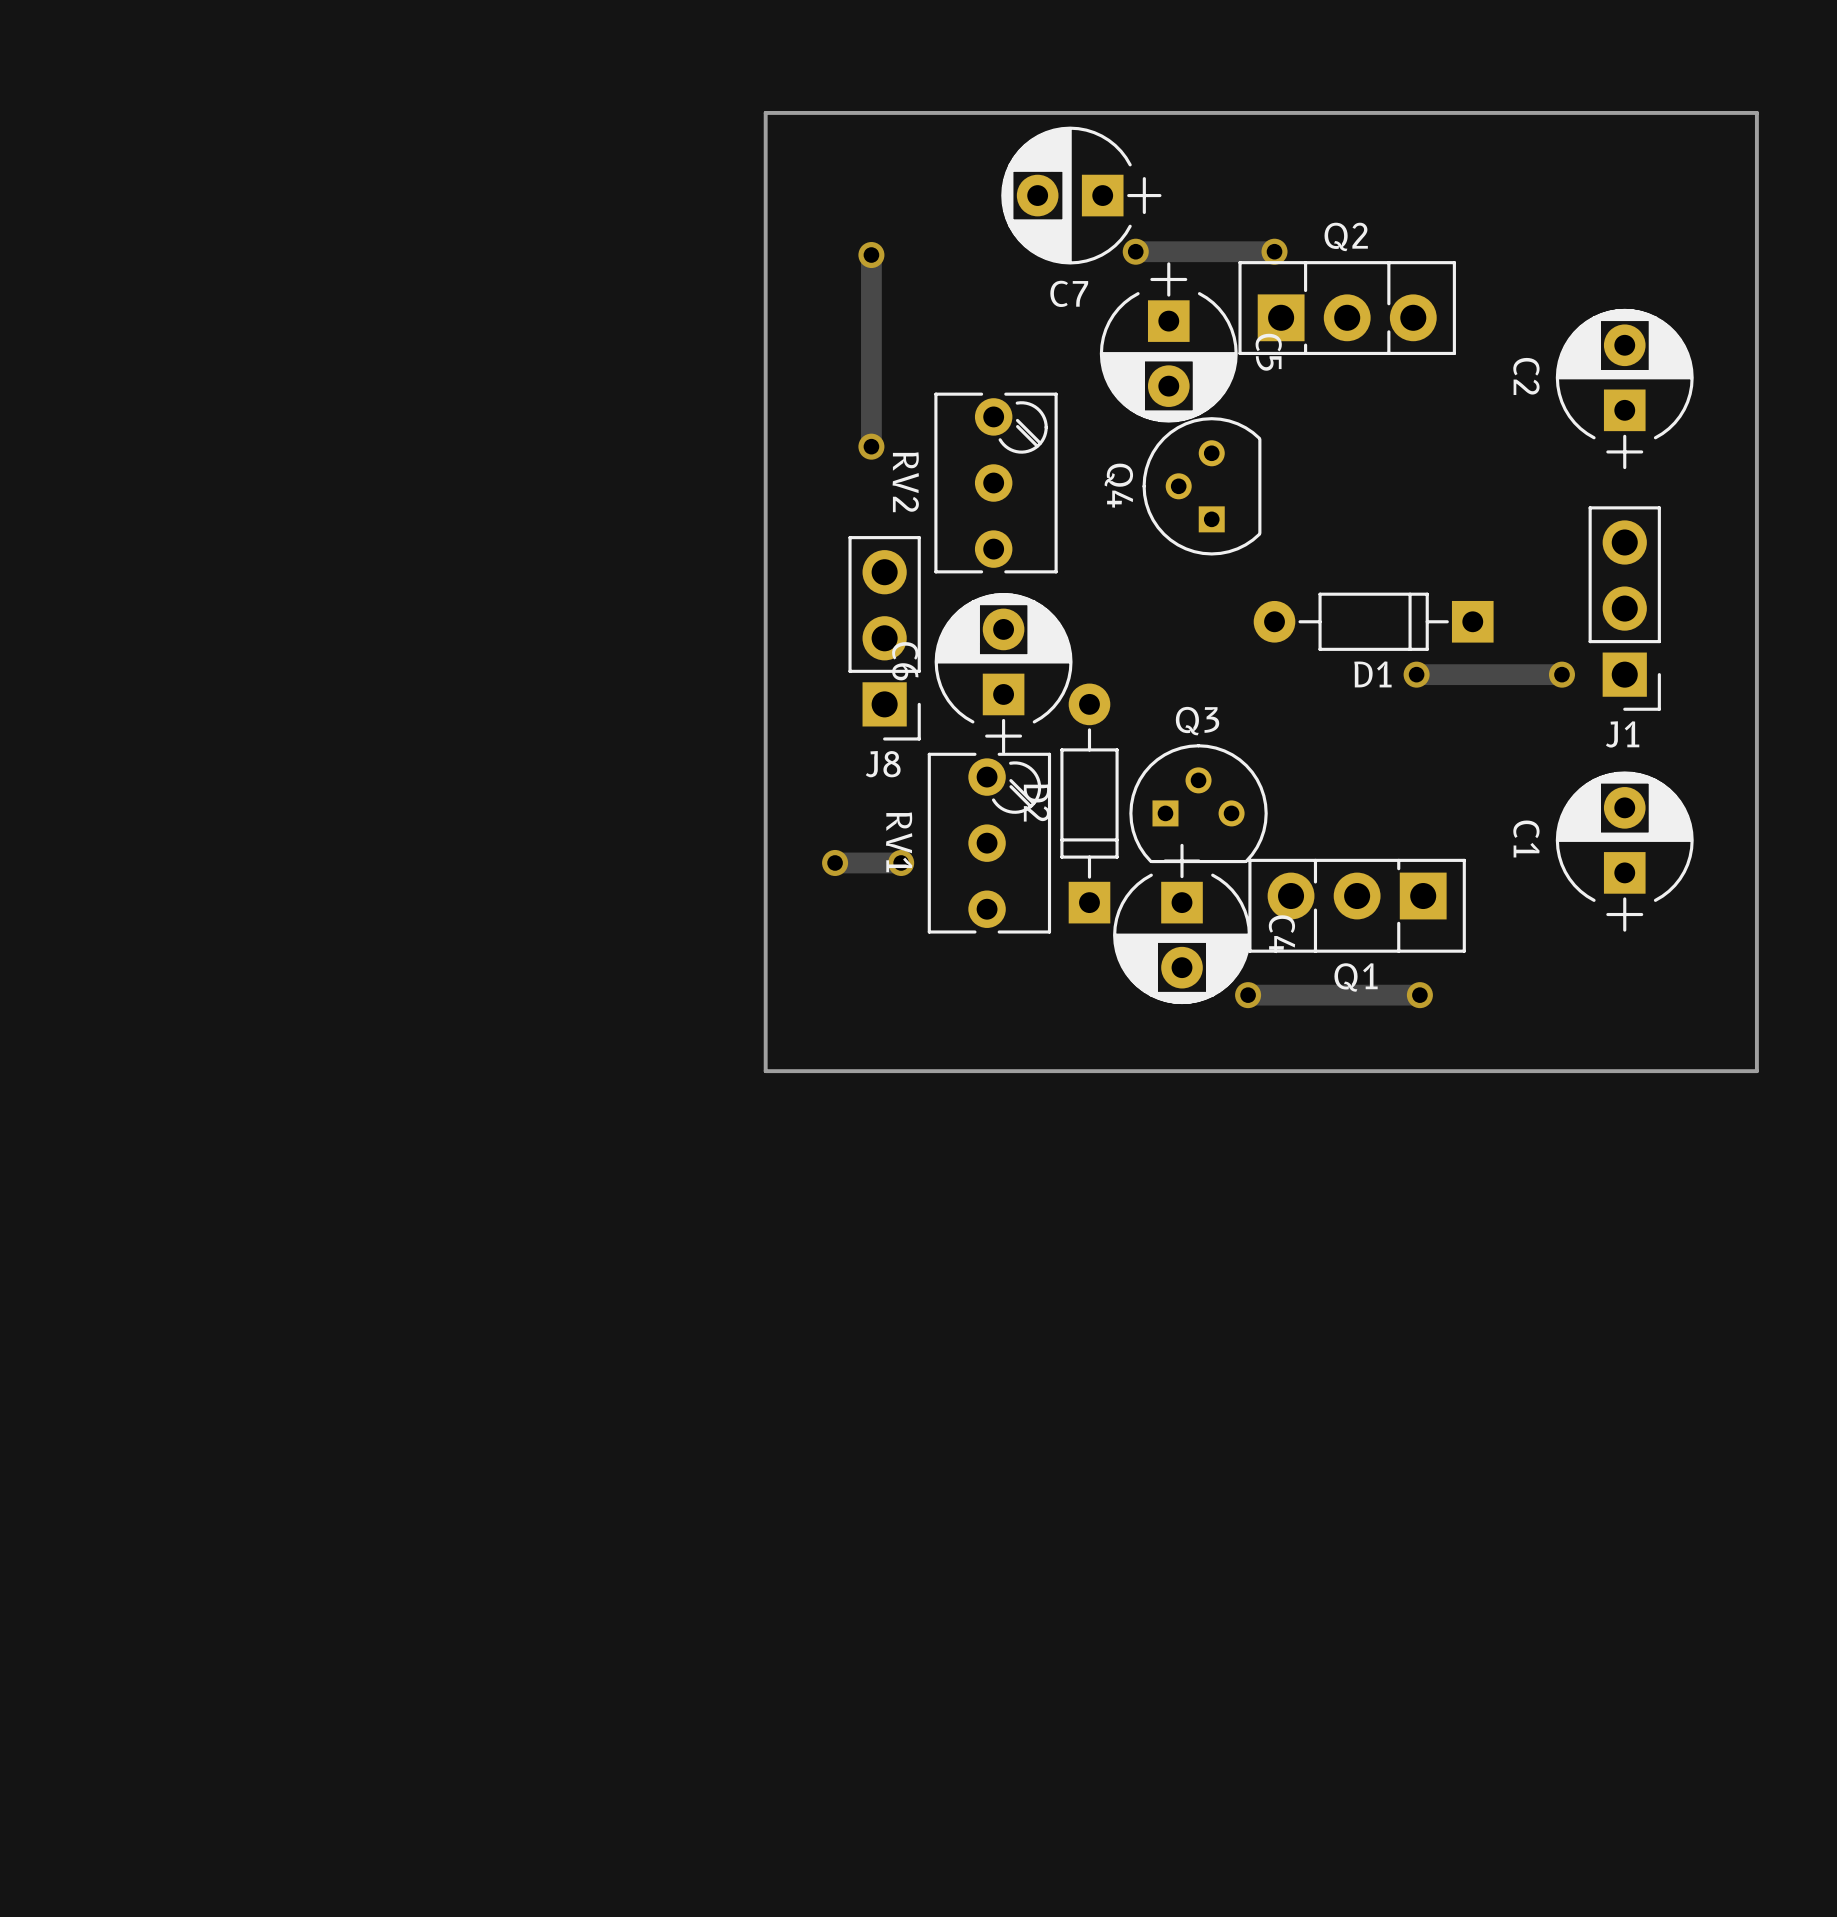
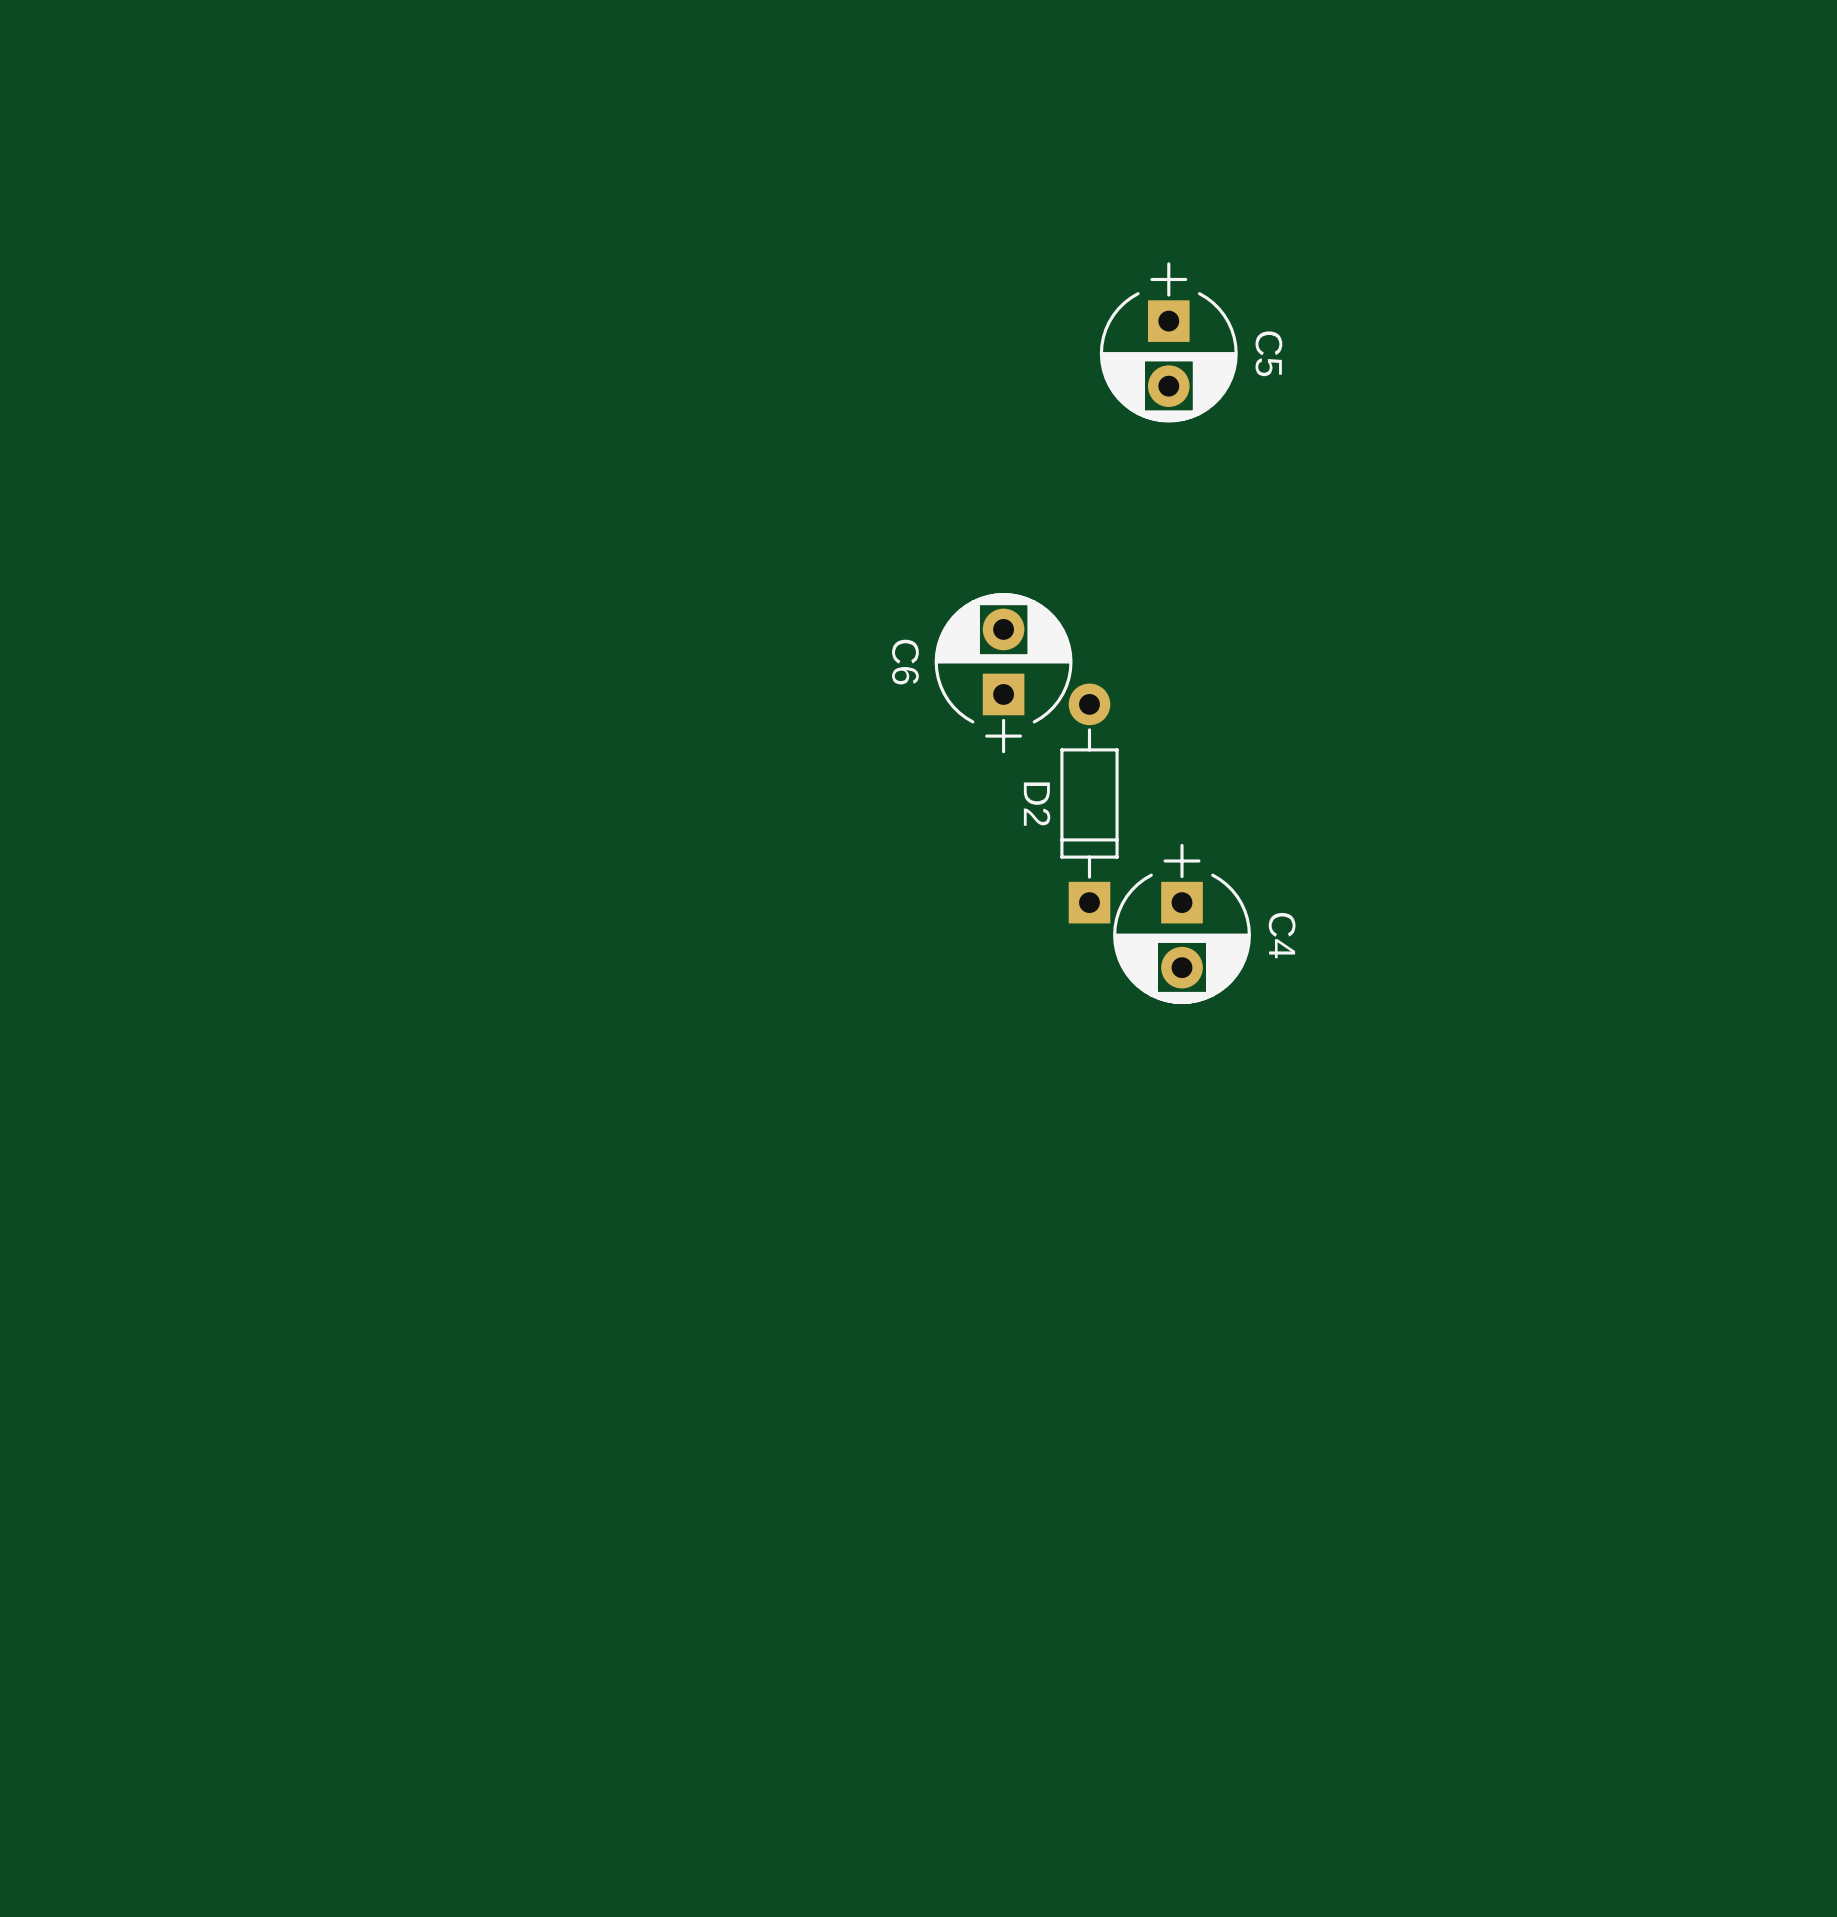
board edge: (1756, 112) (1756, 1071) (765, 1071) (765, 112) (1756, 112) -> none
C7: (1081, 195) -> none
via: (1135, 251) -> none
track: (1274, 251) (1135, 251) -> none
via: (1274, 251) -> none
track: (871, 255) (871, 446) -> none
via: (871, 255) -> none
Q2: (1347, 308) -> none
C2: (1624, 388) -> none
via: (871, 446) -> none
RV2: (996, 483) -> none
Q4: (1201, 486) -> none
J1: (1624, 608) -> none
D1: (1373, 621) -> none
J8: (884, 638) -> none
via: (1416, 674) -> none
track: (1561, 674) (1416, 674) -> none
via: (1561, 674) -> none
Q3: (1198, 803) -> none
RV1: (989, 843) -> none
C1: (1624, 851) -> none
via: (835, 862) -> none
track: (901, 862) (835, 862) -> none
via: (901, 862) -> none
Q1: (1357, 905) -> none
via: (1248, 995) -> none
track: (1419, 995) (1248, 995) -> none
via: (1419, 995) -> none

